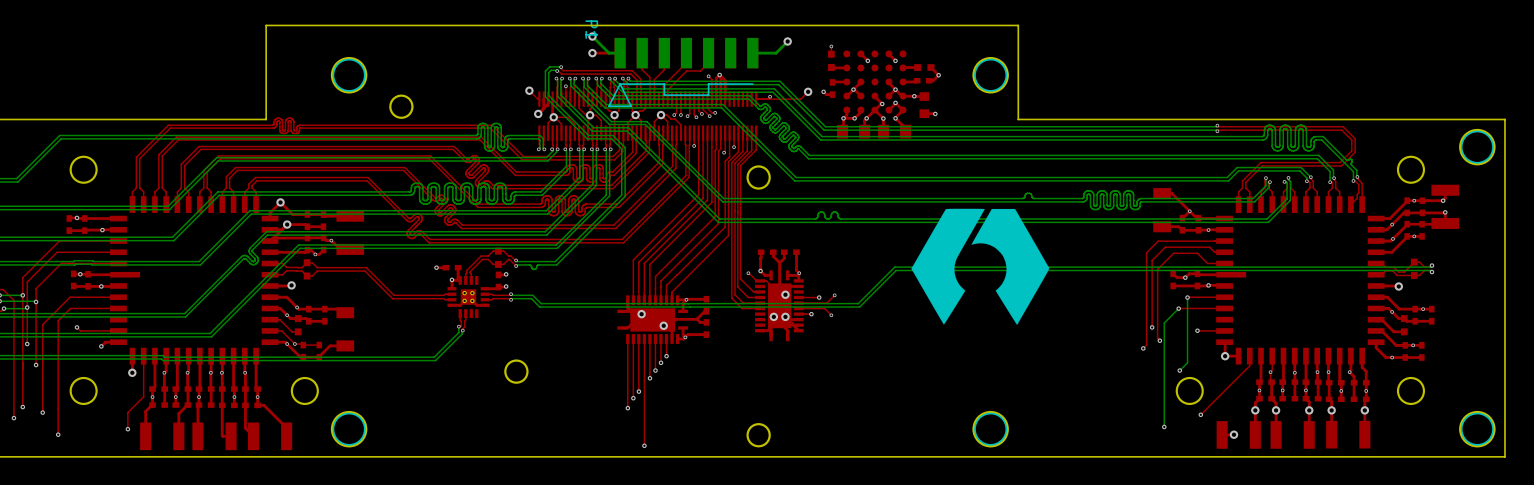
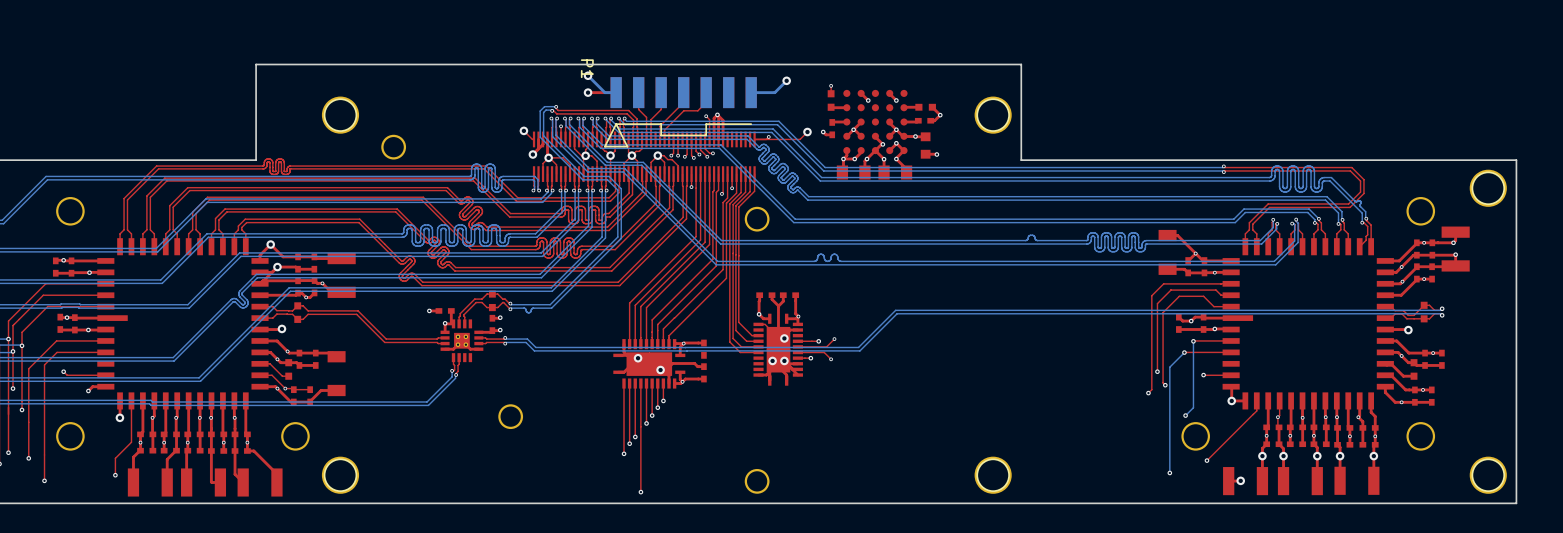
drawing: [911, 208, 1050, 325] -> none
top track: (748, 273) (756, 280) (760, 280) -> none
via: (748, 273) -> none
top track: (706, 311) (697, 319) -> none

